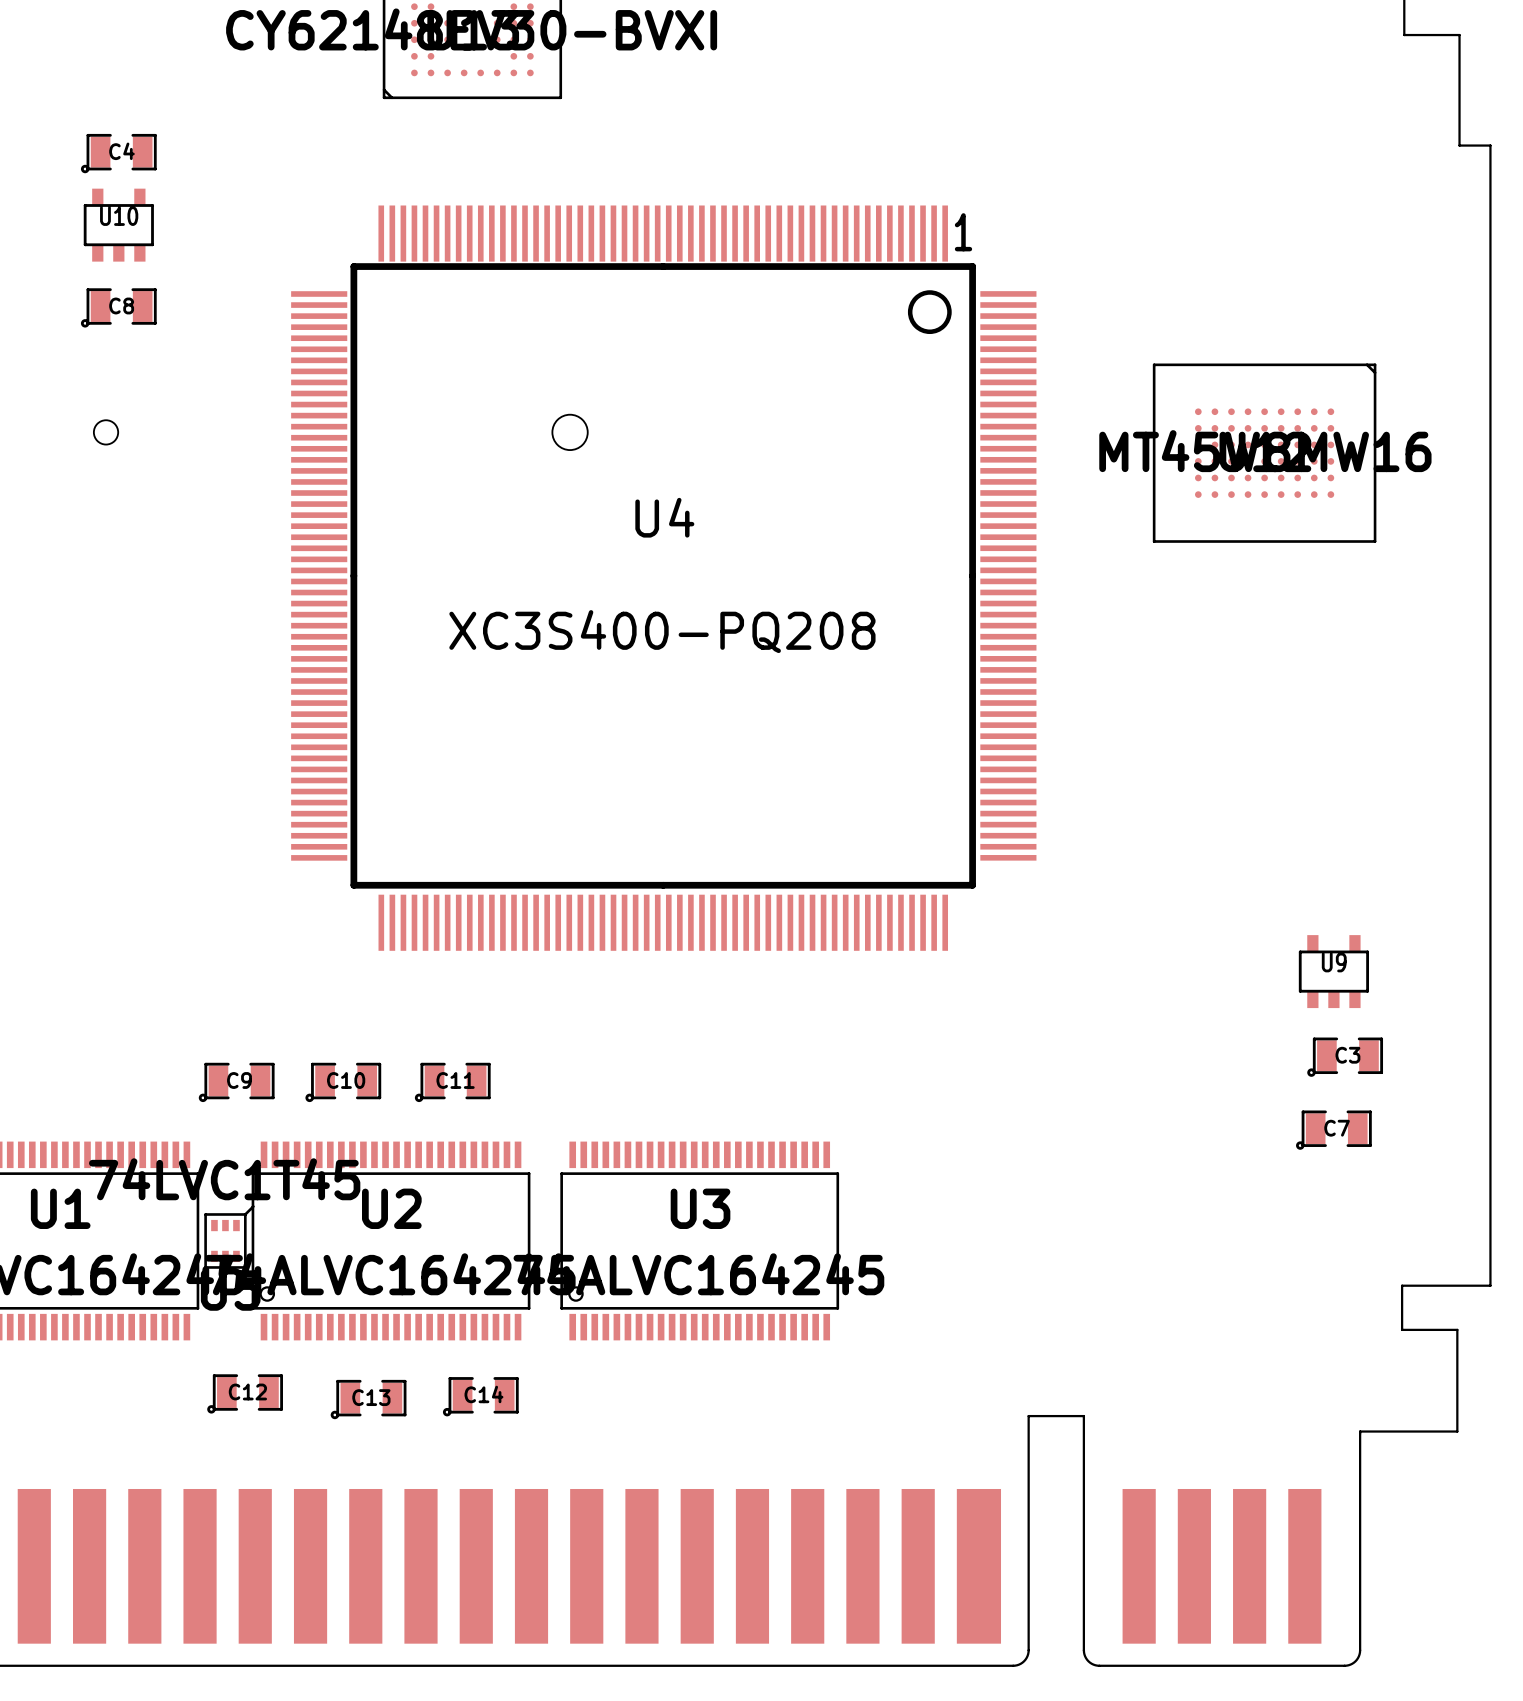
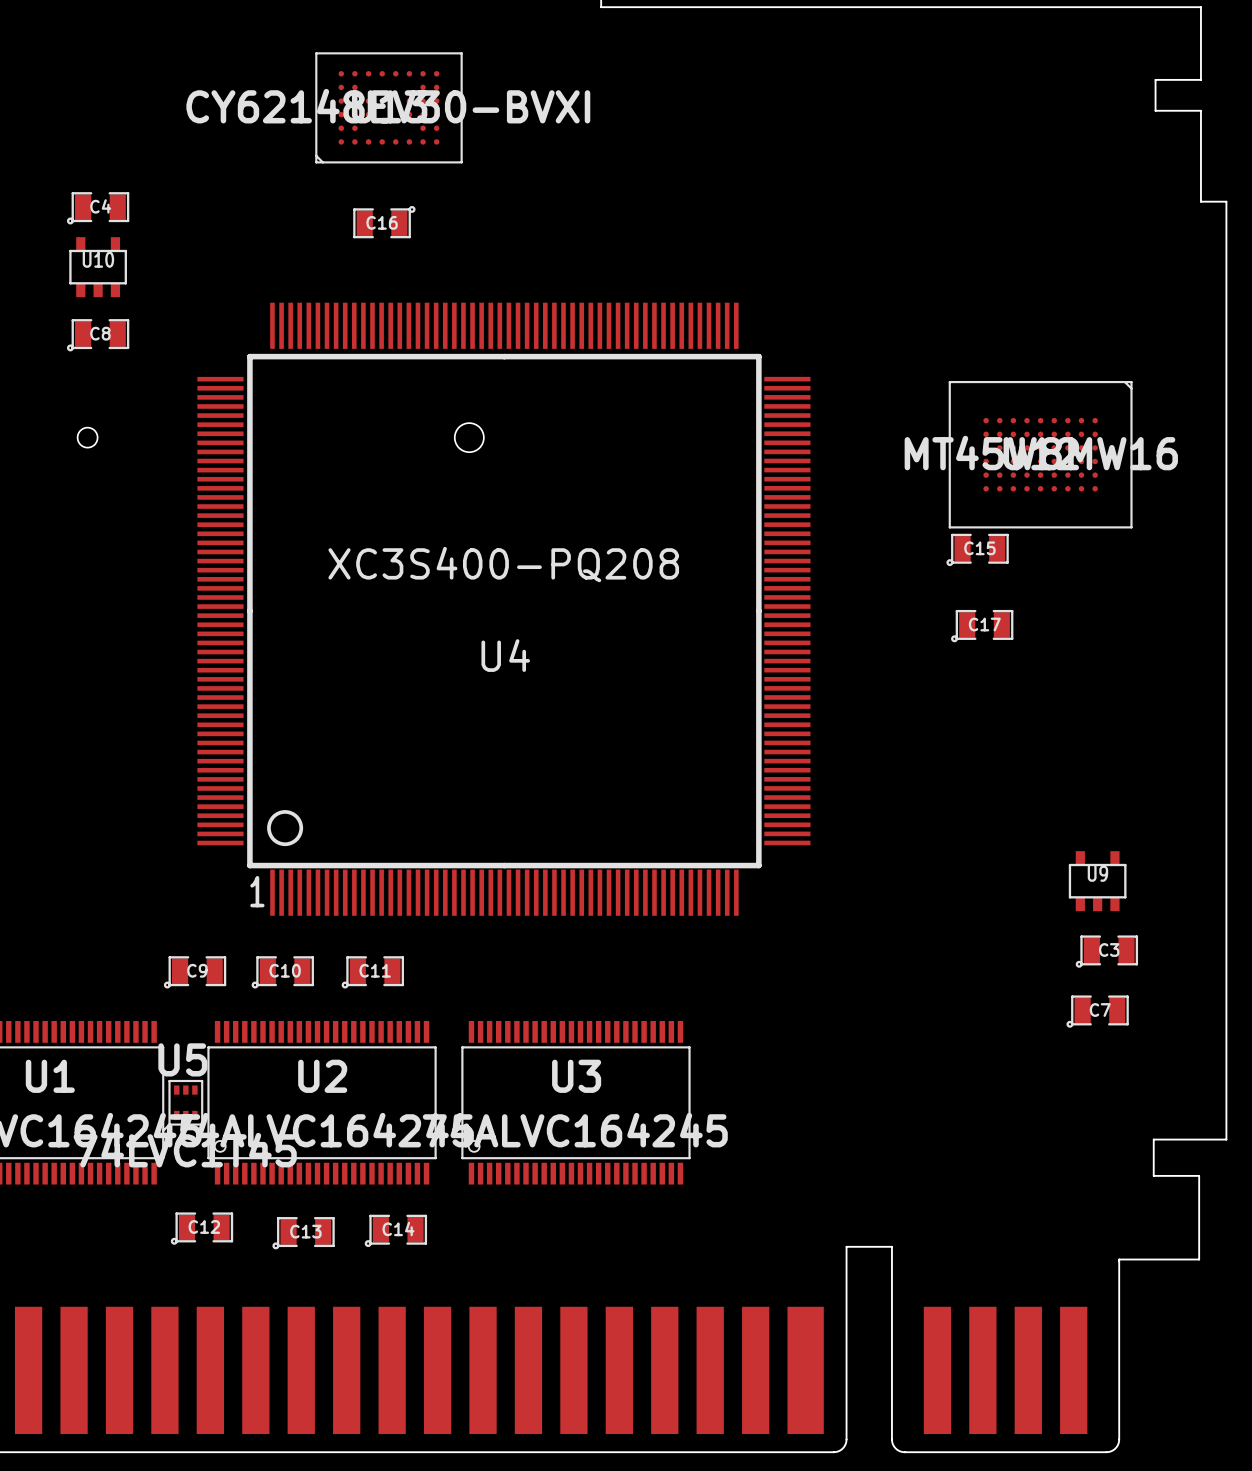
C16: none -> (384, 222)
C15: none -> (977, 549)
U4 rotation: 0° (663, 578) -> 180° (503, 609)
C17: none -> (982, 626)
U5 rotation: 0° (229, 1236) -> 180° (182, 1106)

